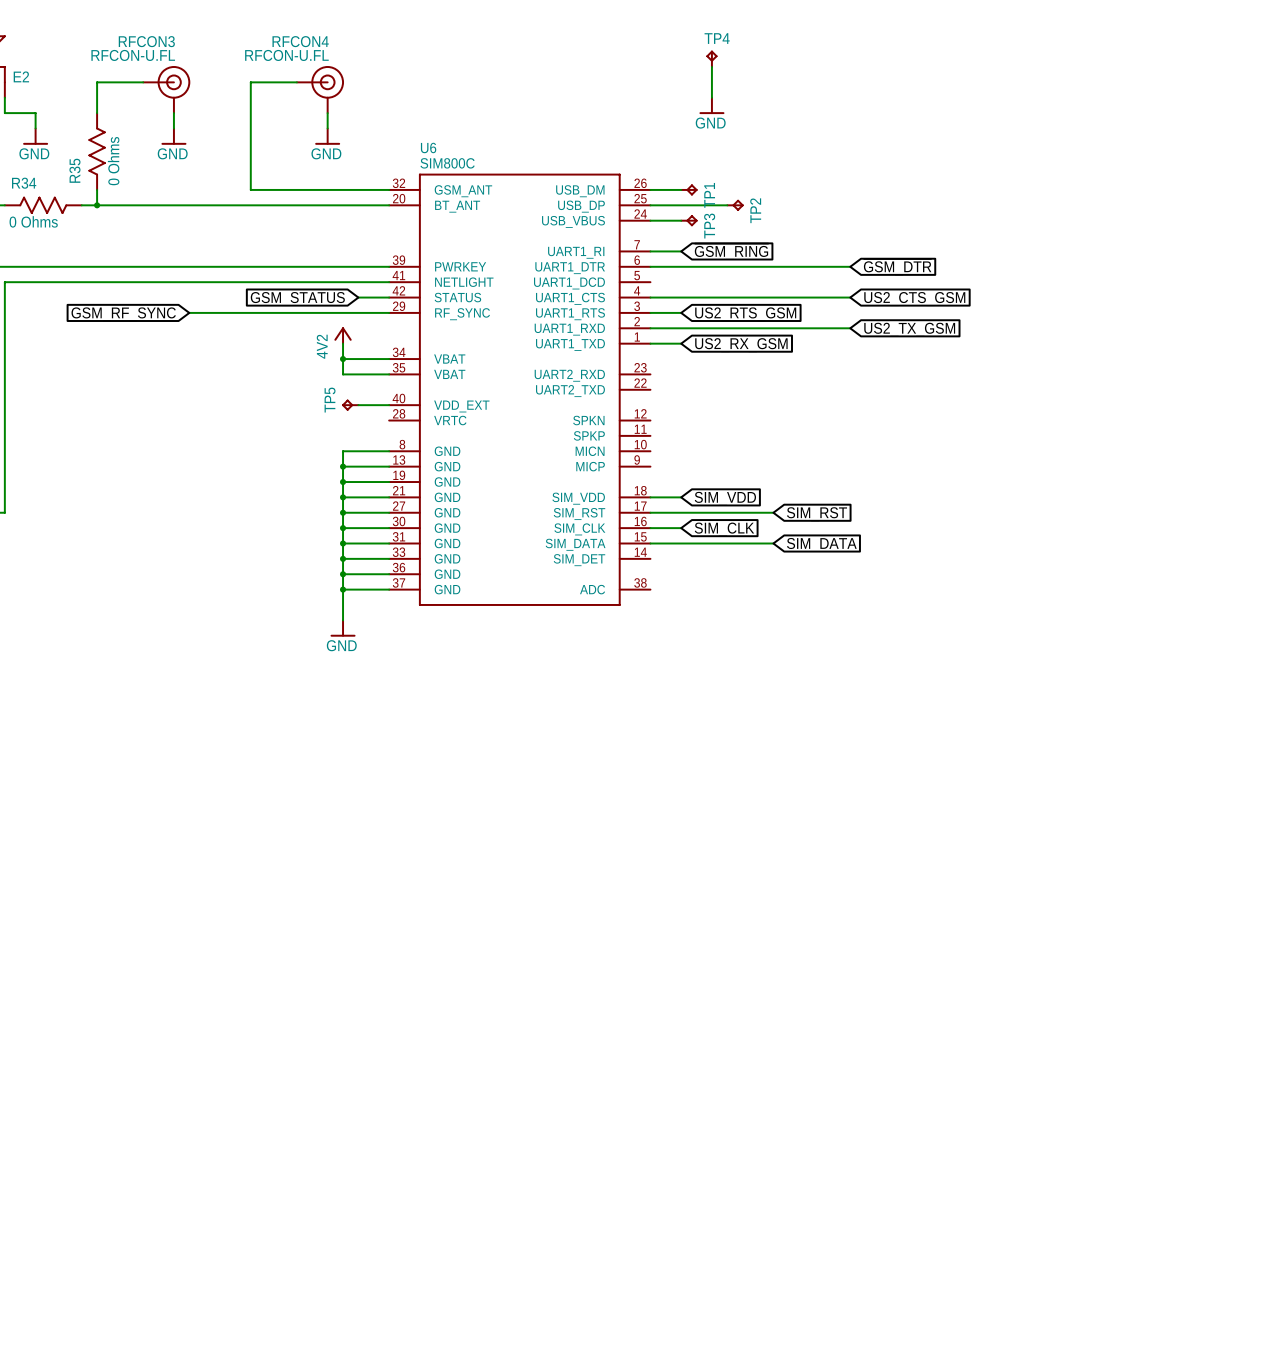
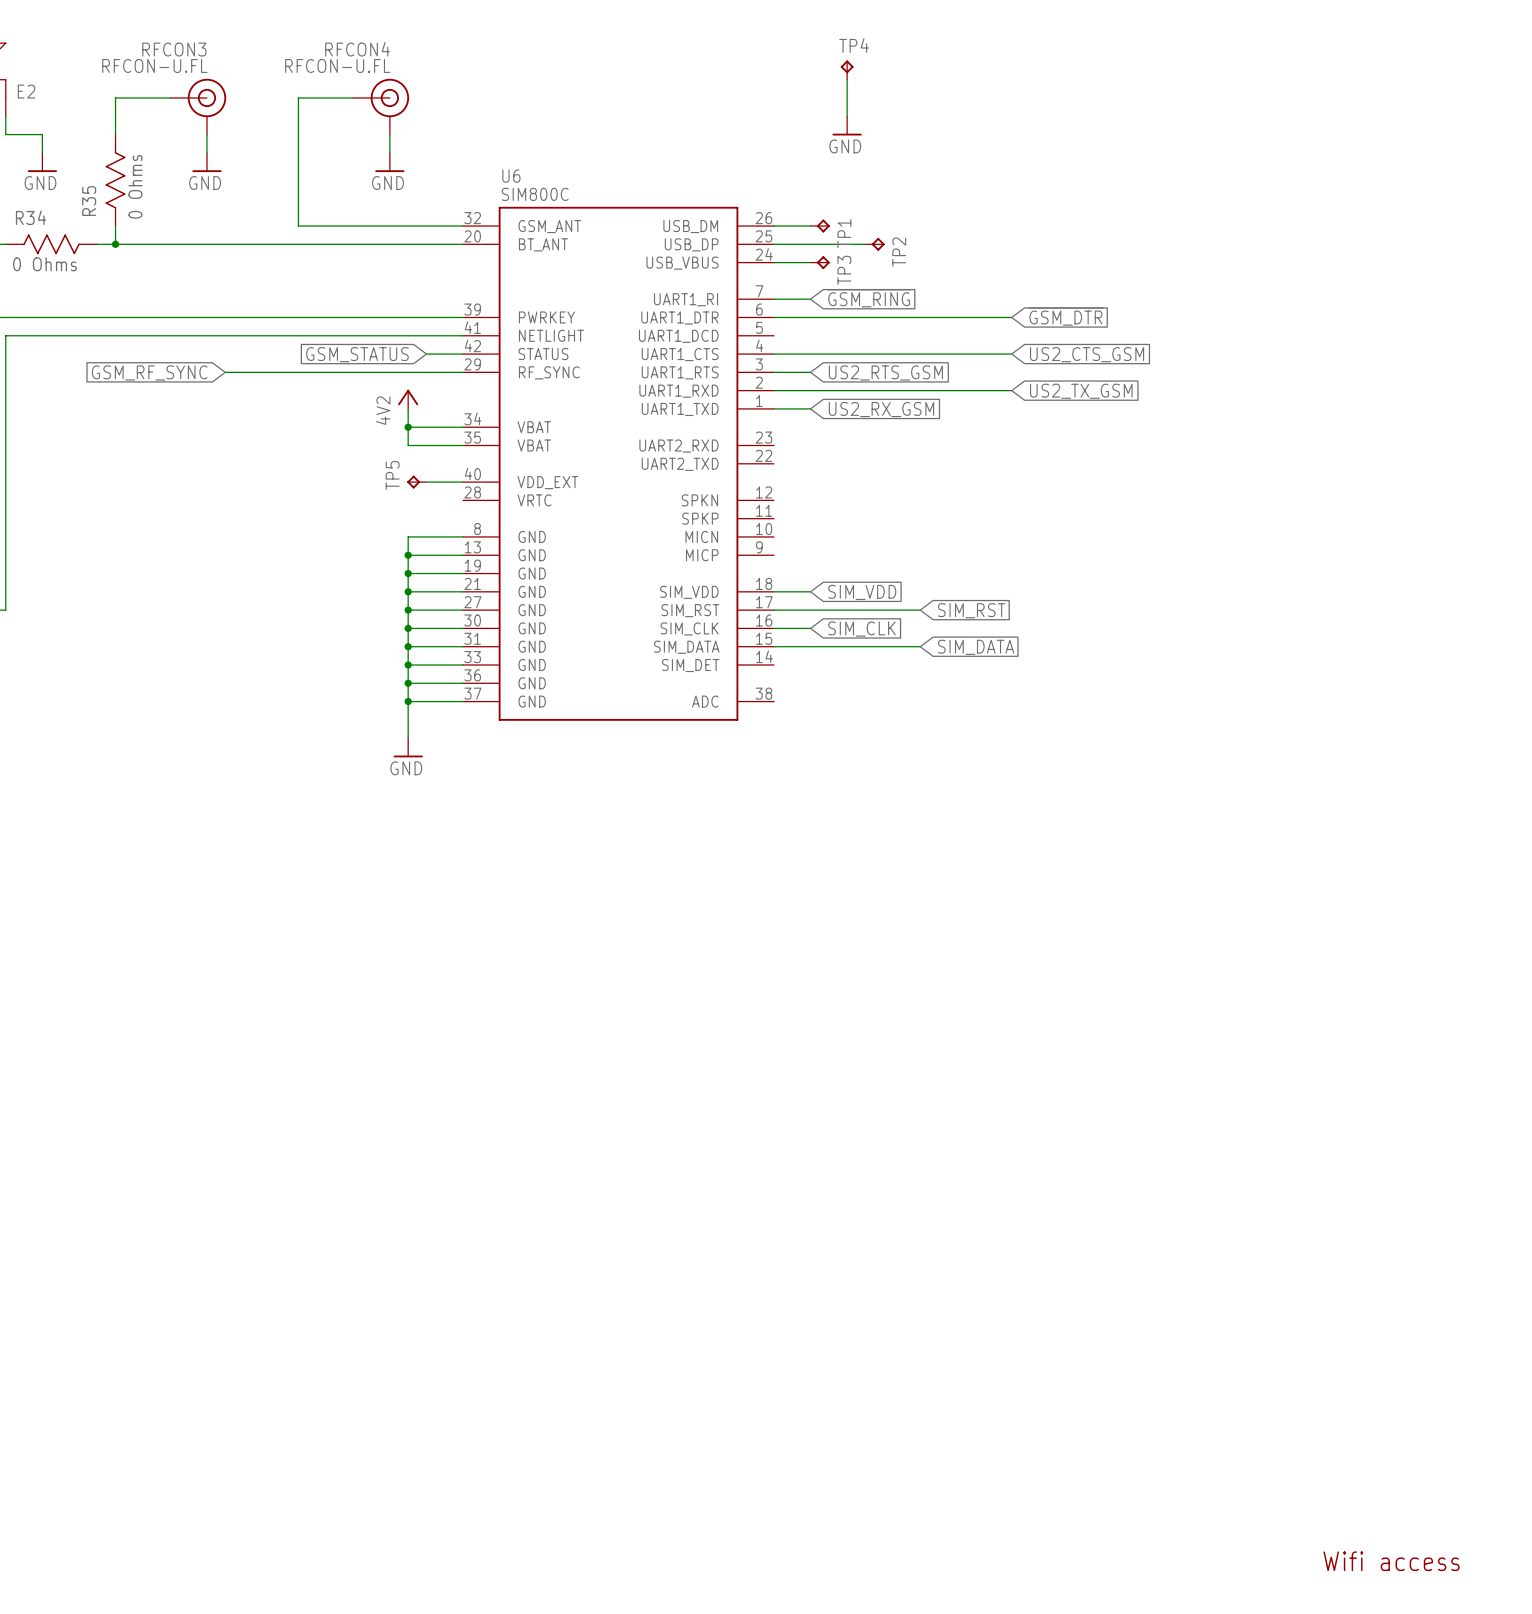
text: none -> Wifi access (1391, 1561)

